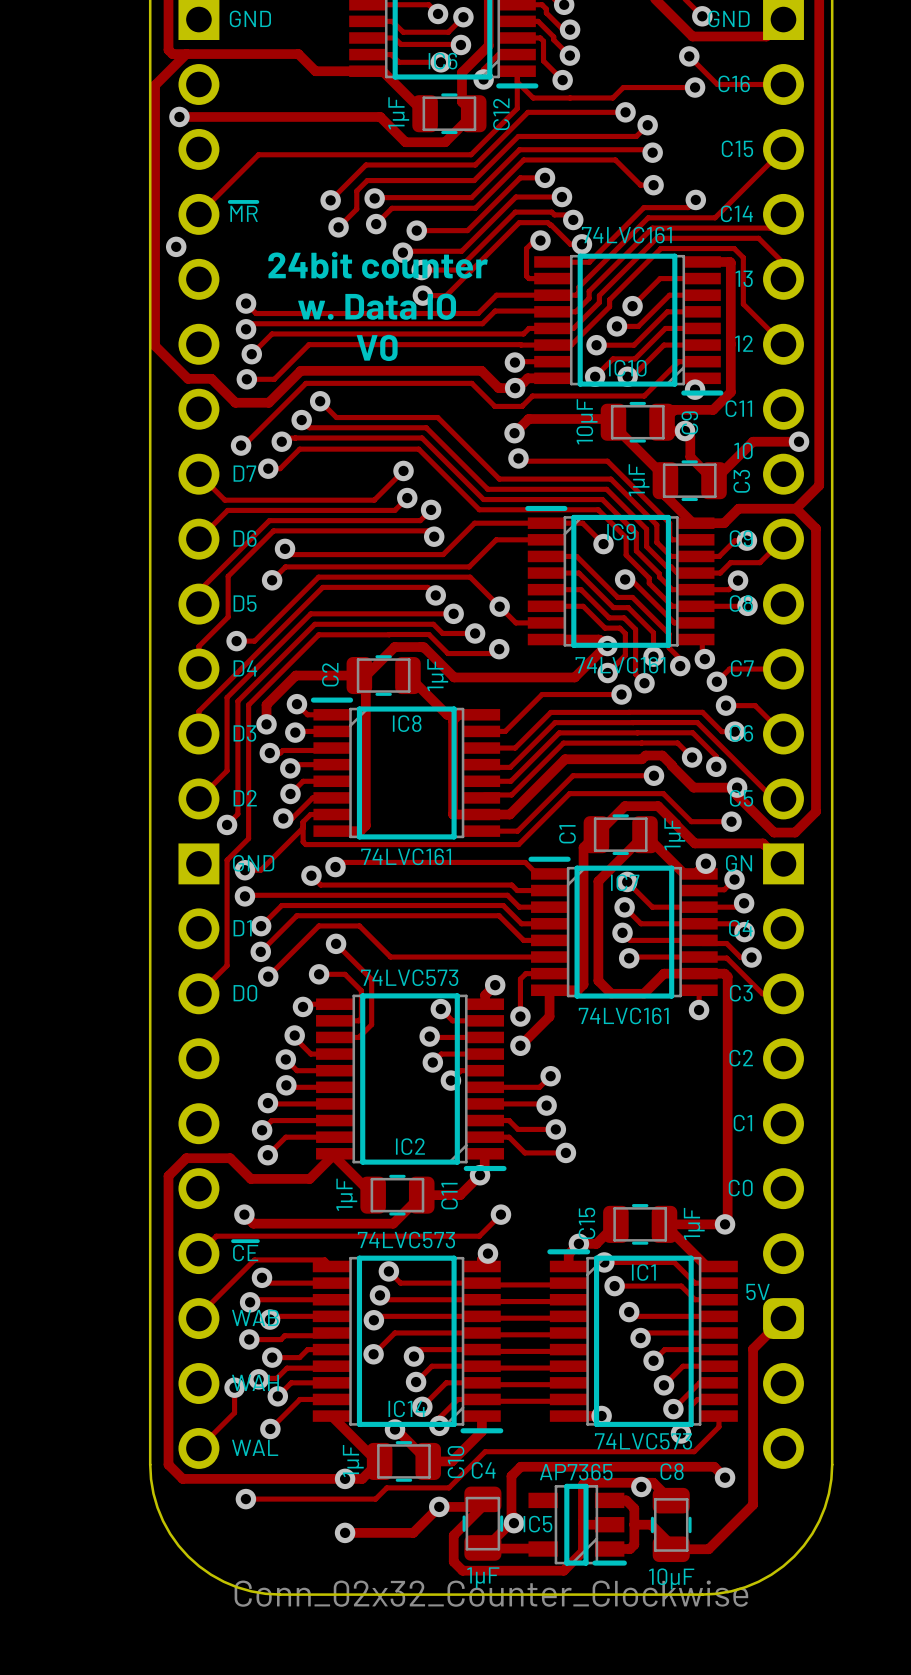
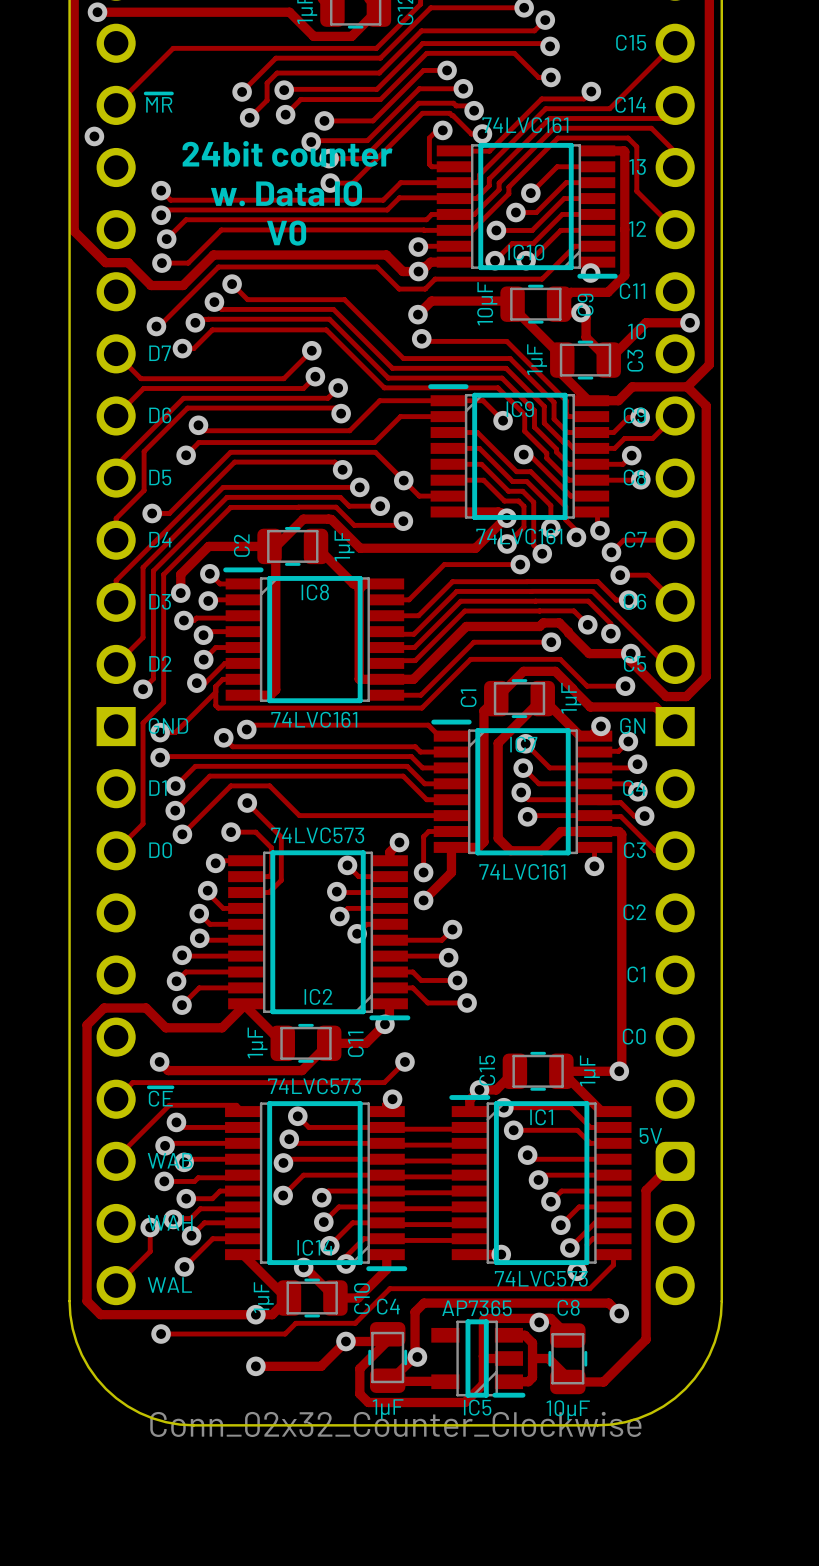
IC5 name position: IC5 (537, 1524) -> IC5 (477, 1407)

